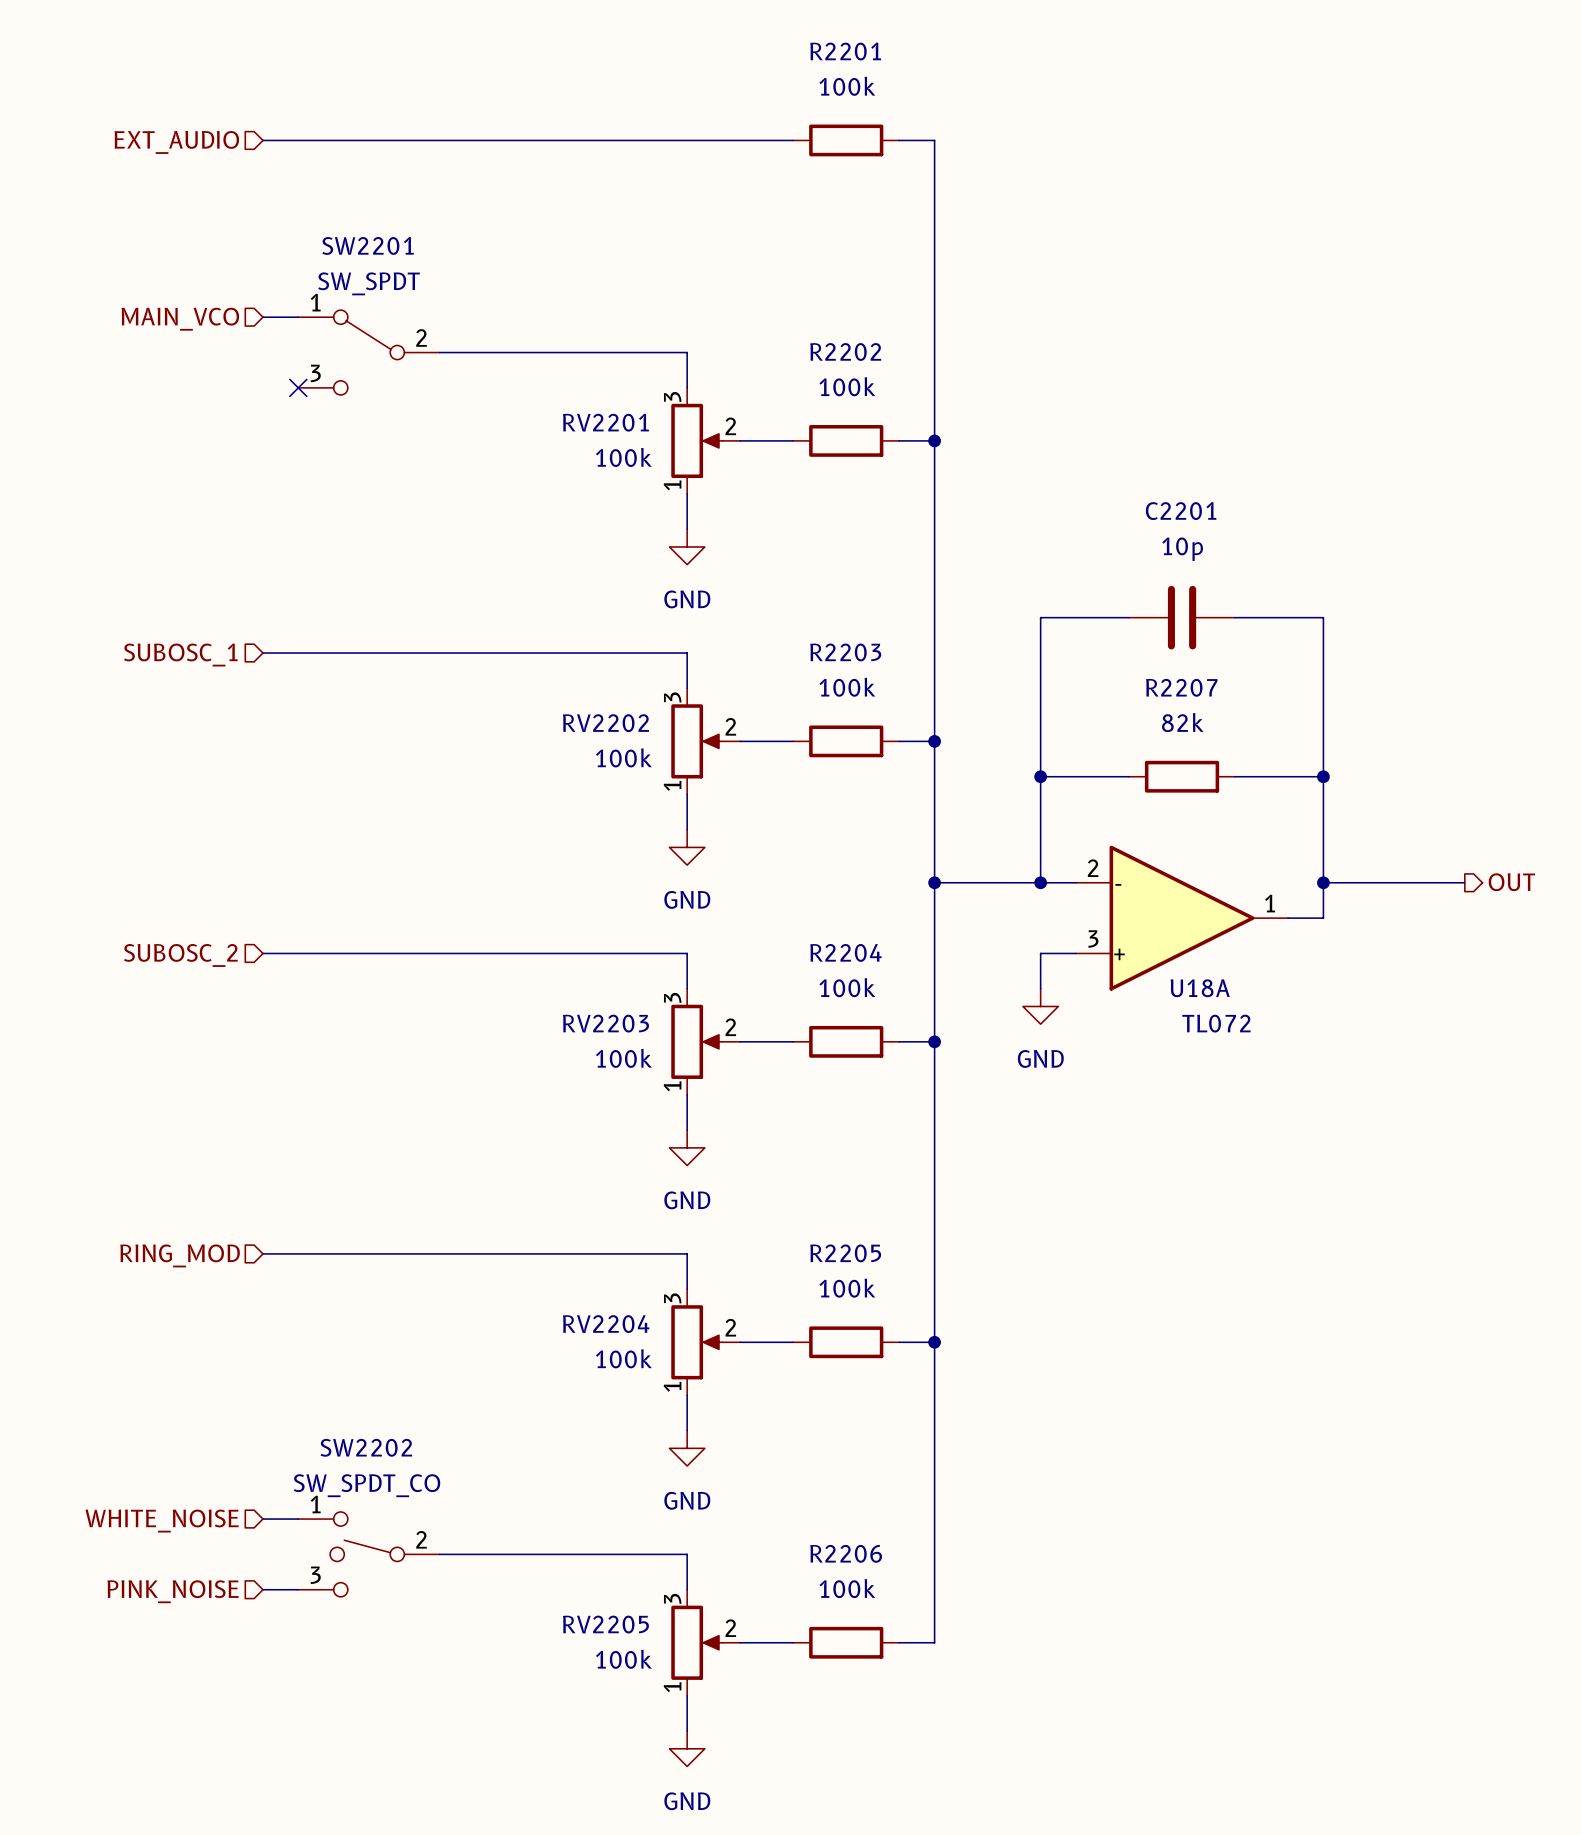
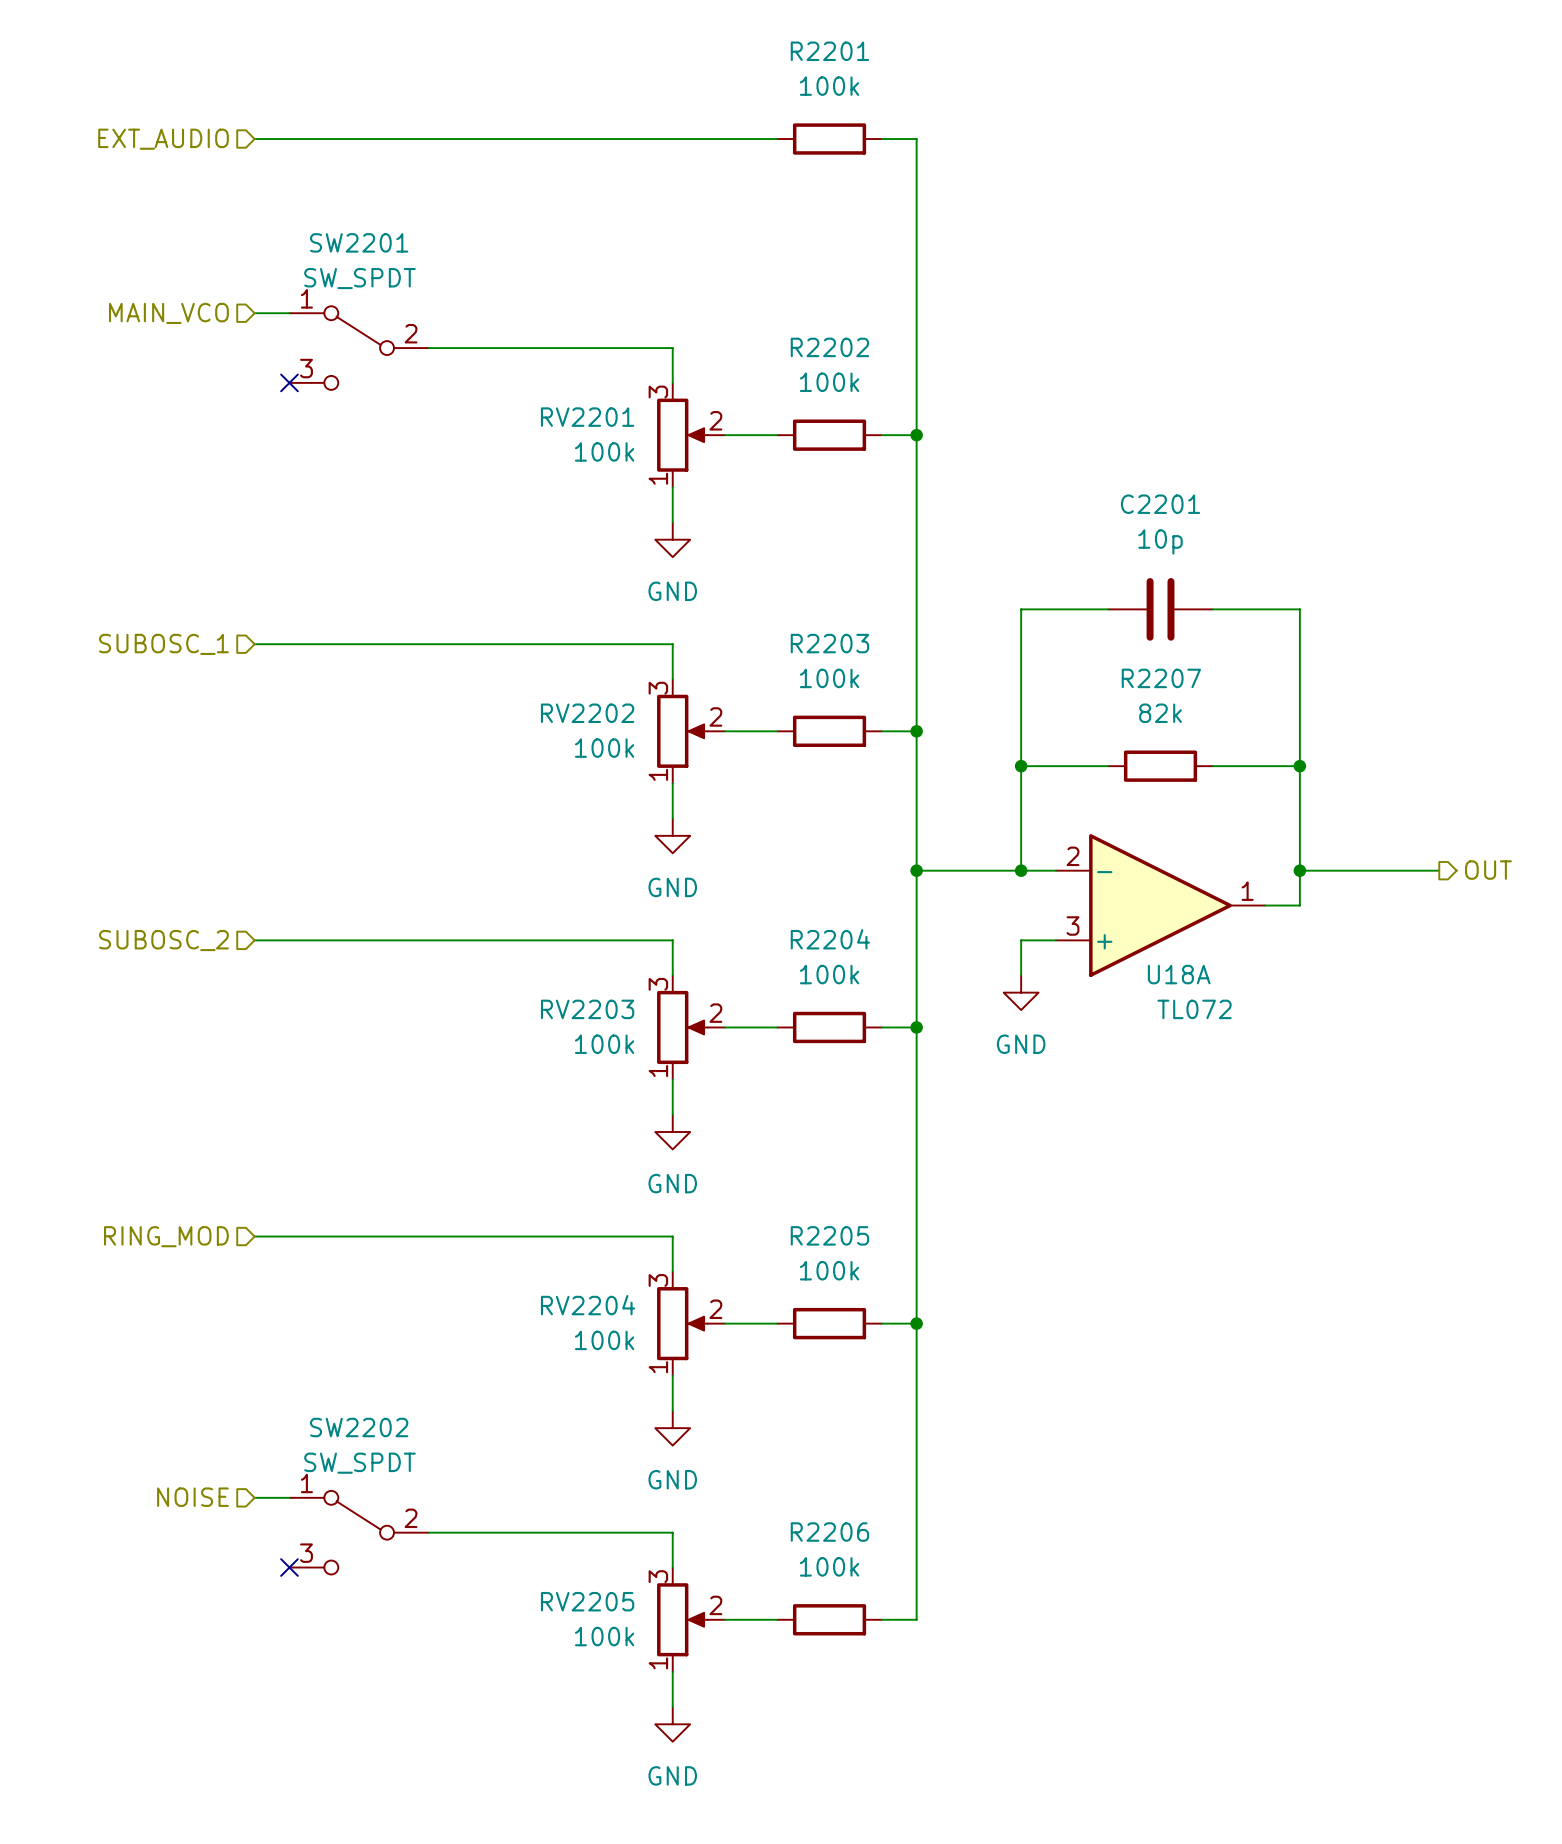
SW2202 value: SW_SPDT_CO (367, 1485) -> SW_SPDT (359, 1463)
SW2202 symbol: [298, 1511, 440, 1597] -> [289, 1490, 429, 1575]
hierarchical label: WHITE_NOISE (162, 1521) -> NOISE (192, 1497)
wire: (262, 1589) (298, 1589) -> none
no-connect mark: none -> (289, 1567)
hierarchical label: PINK_NOISE (173, 1591) -> none

